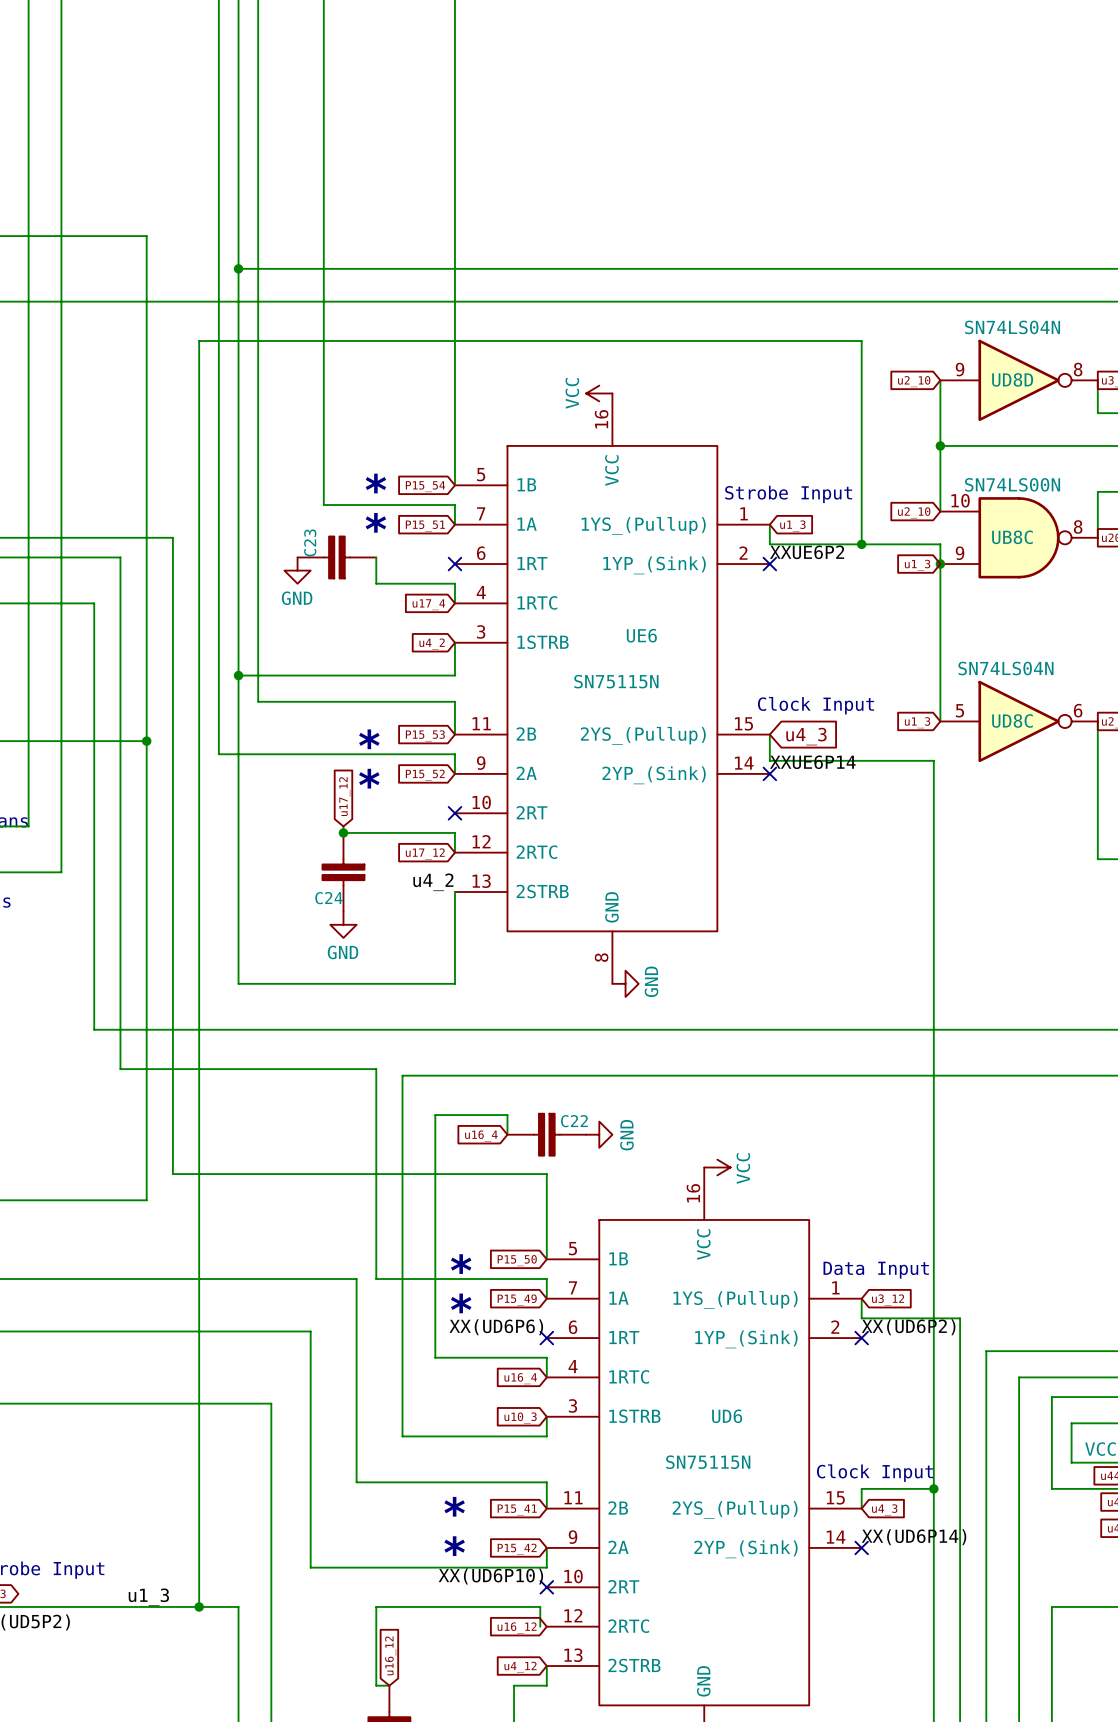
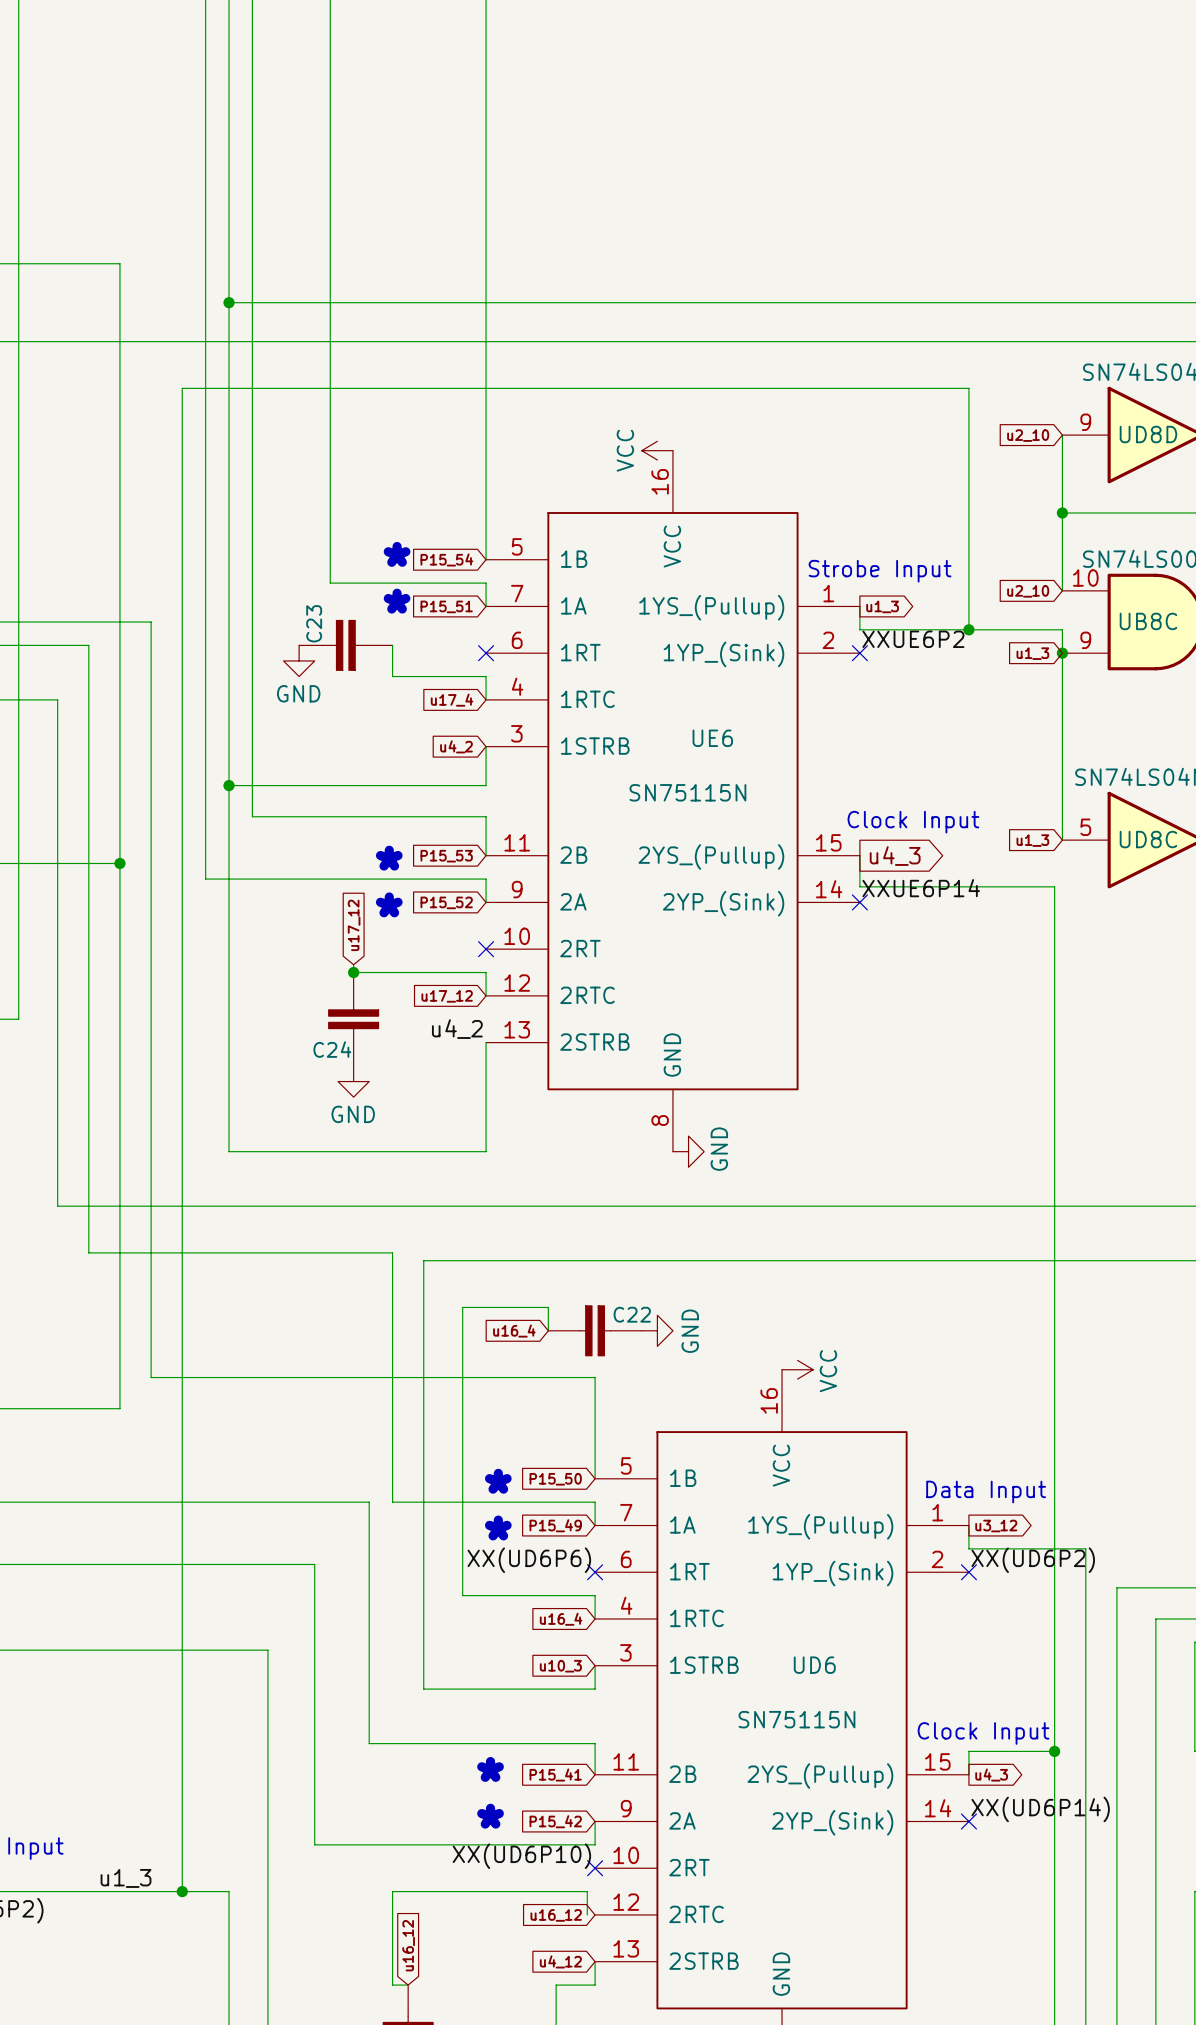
global label shape: input (792, 525) -> output (882, 606)
global label shape: input (806, 736) -> output (895, 856)
global label shape: input (888, 1299) -> output (996, 1525)
global label shape: input (884, 1509) -> output (991, 1775)

